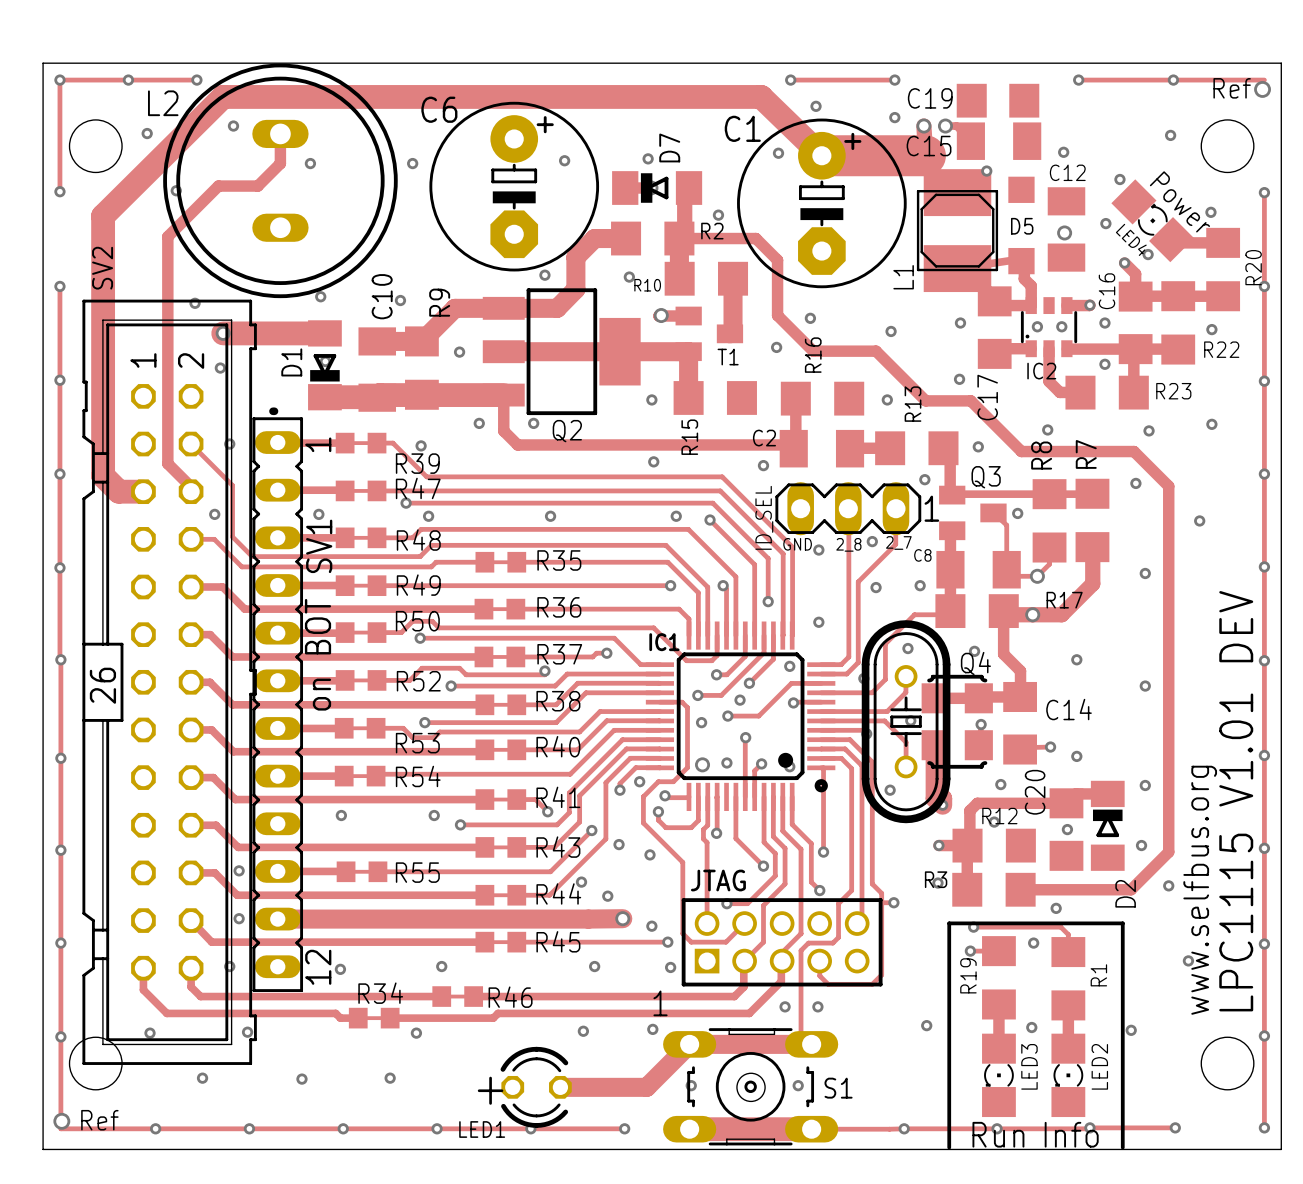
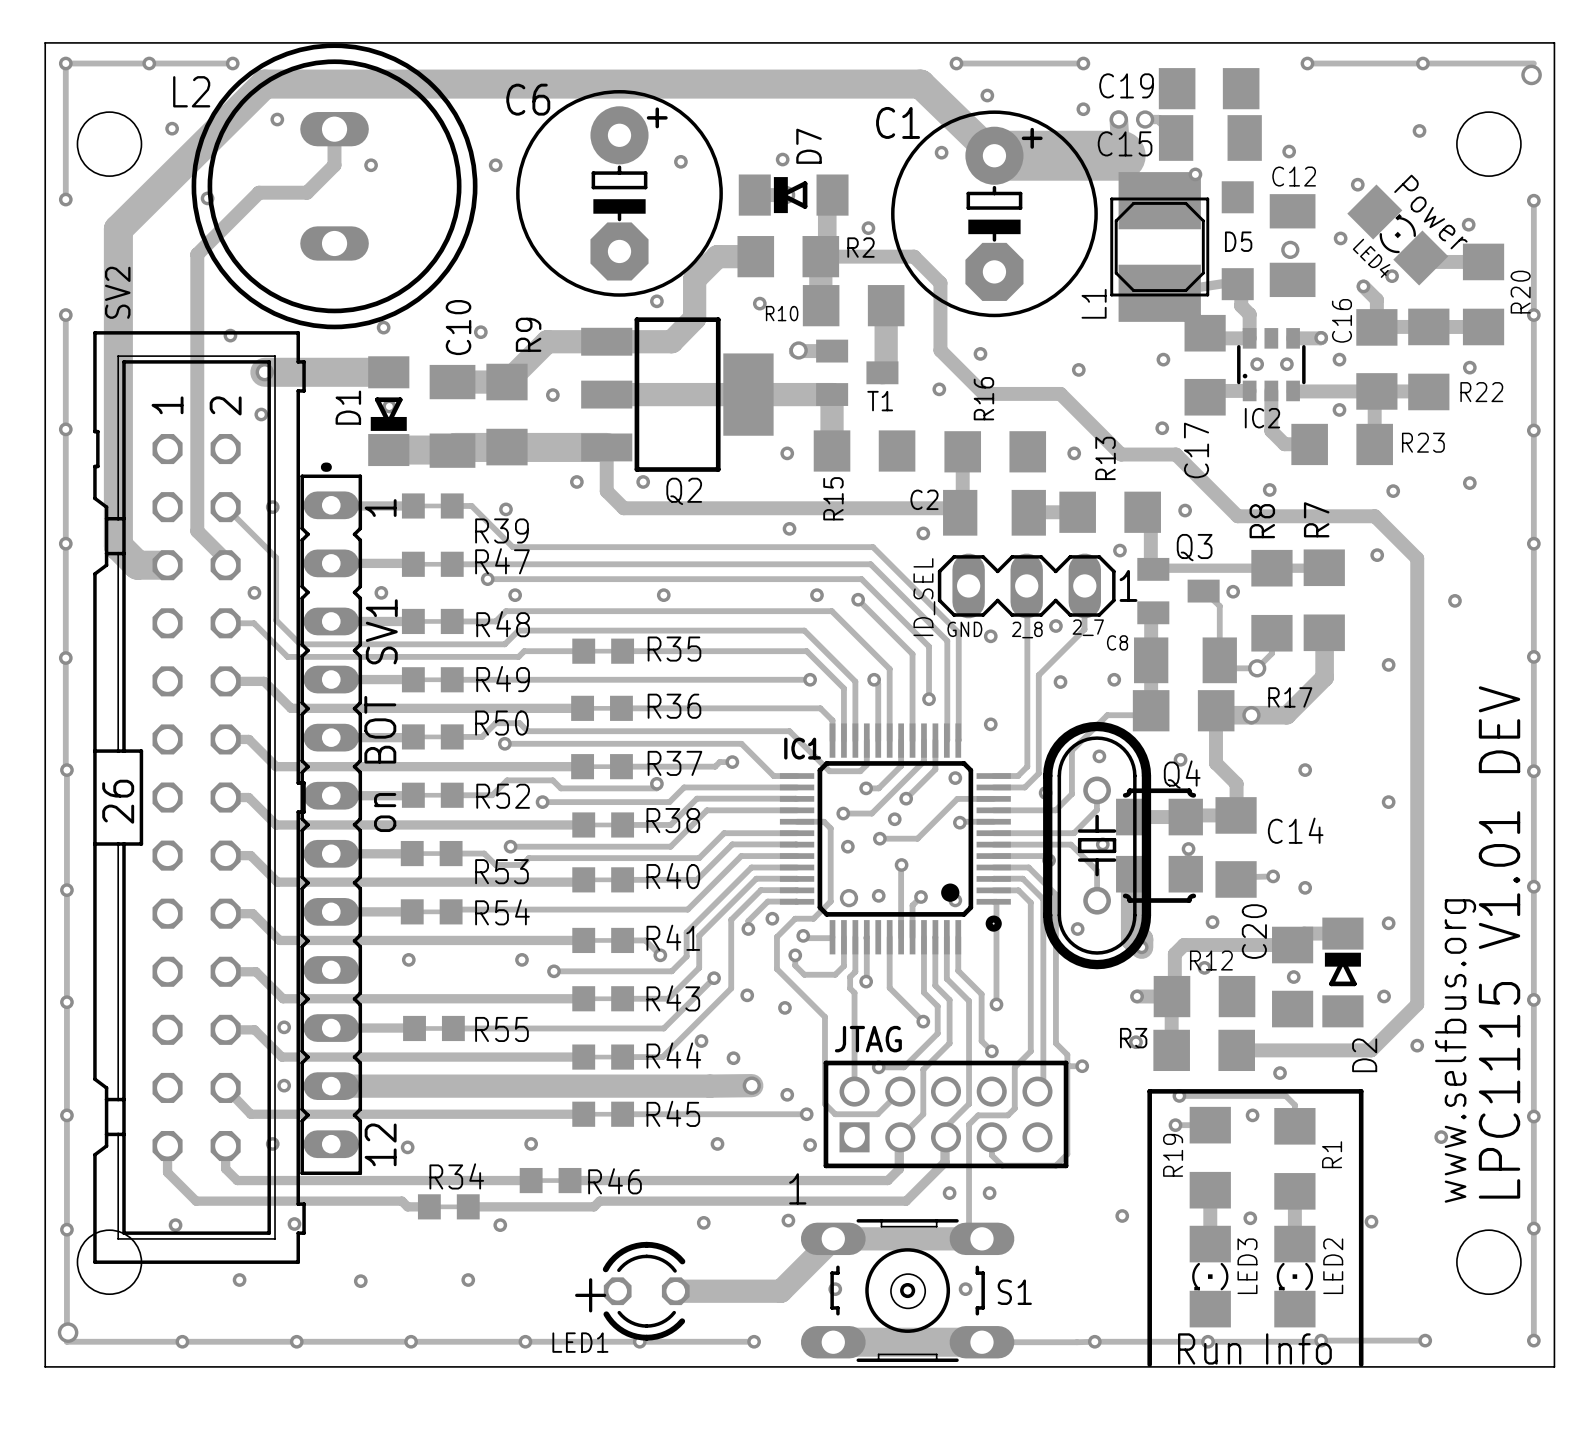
text: Ref (1232, 88) -> none
text: Ref (99, 1120) -> none

